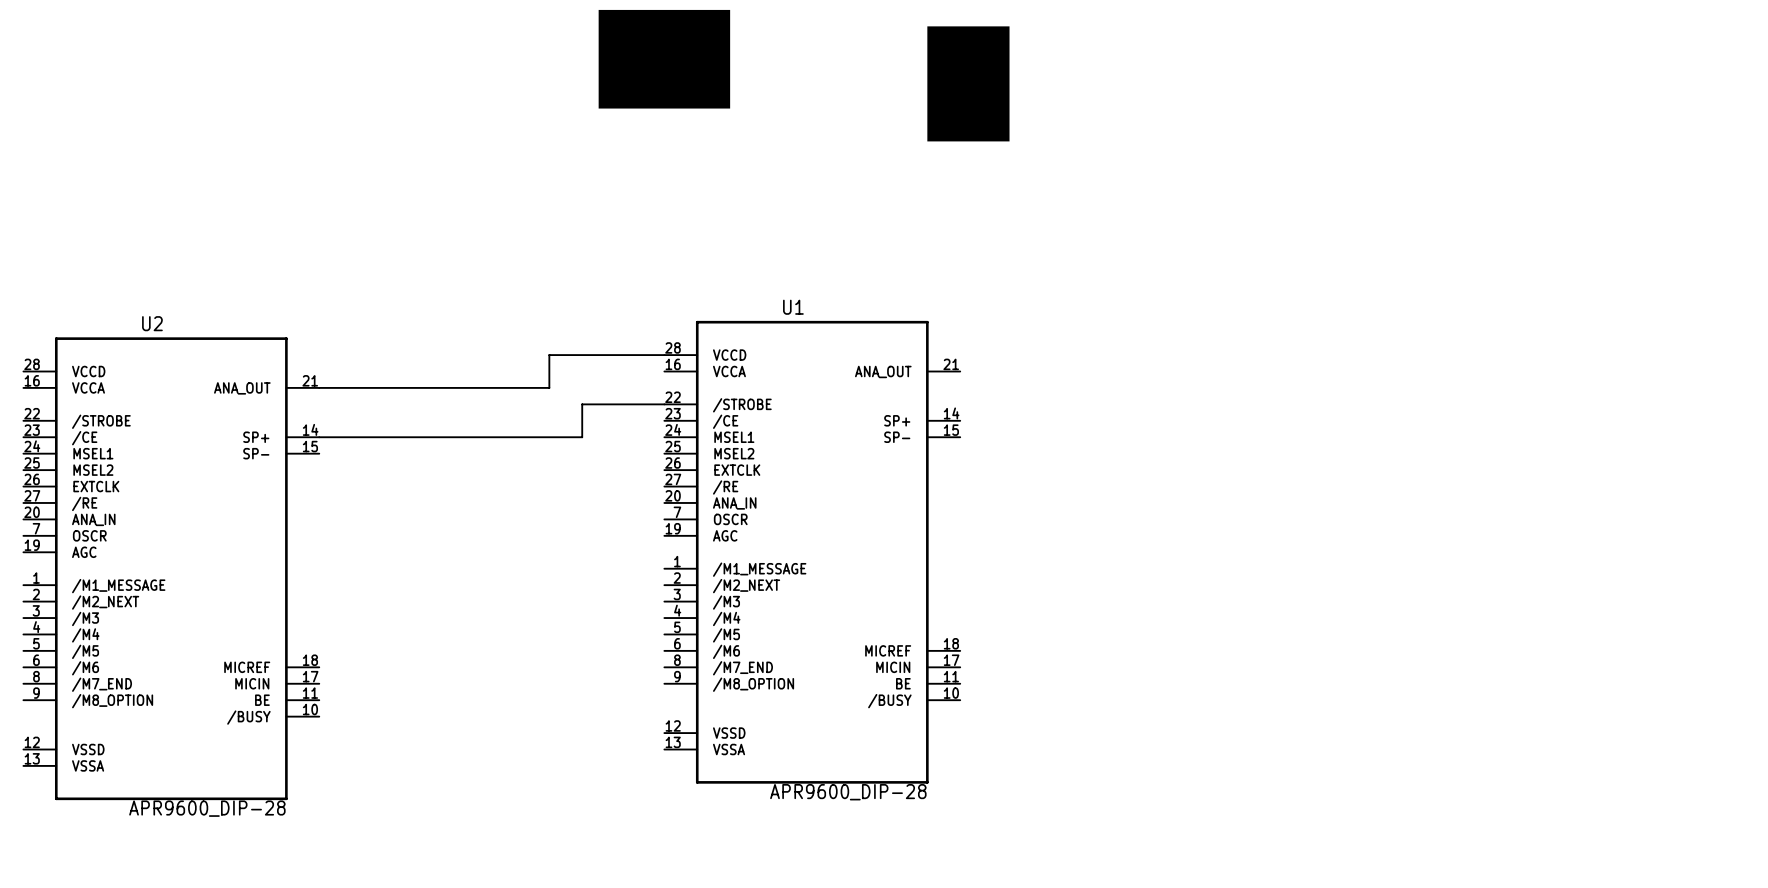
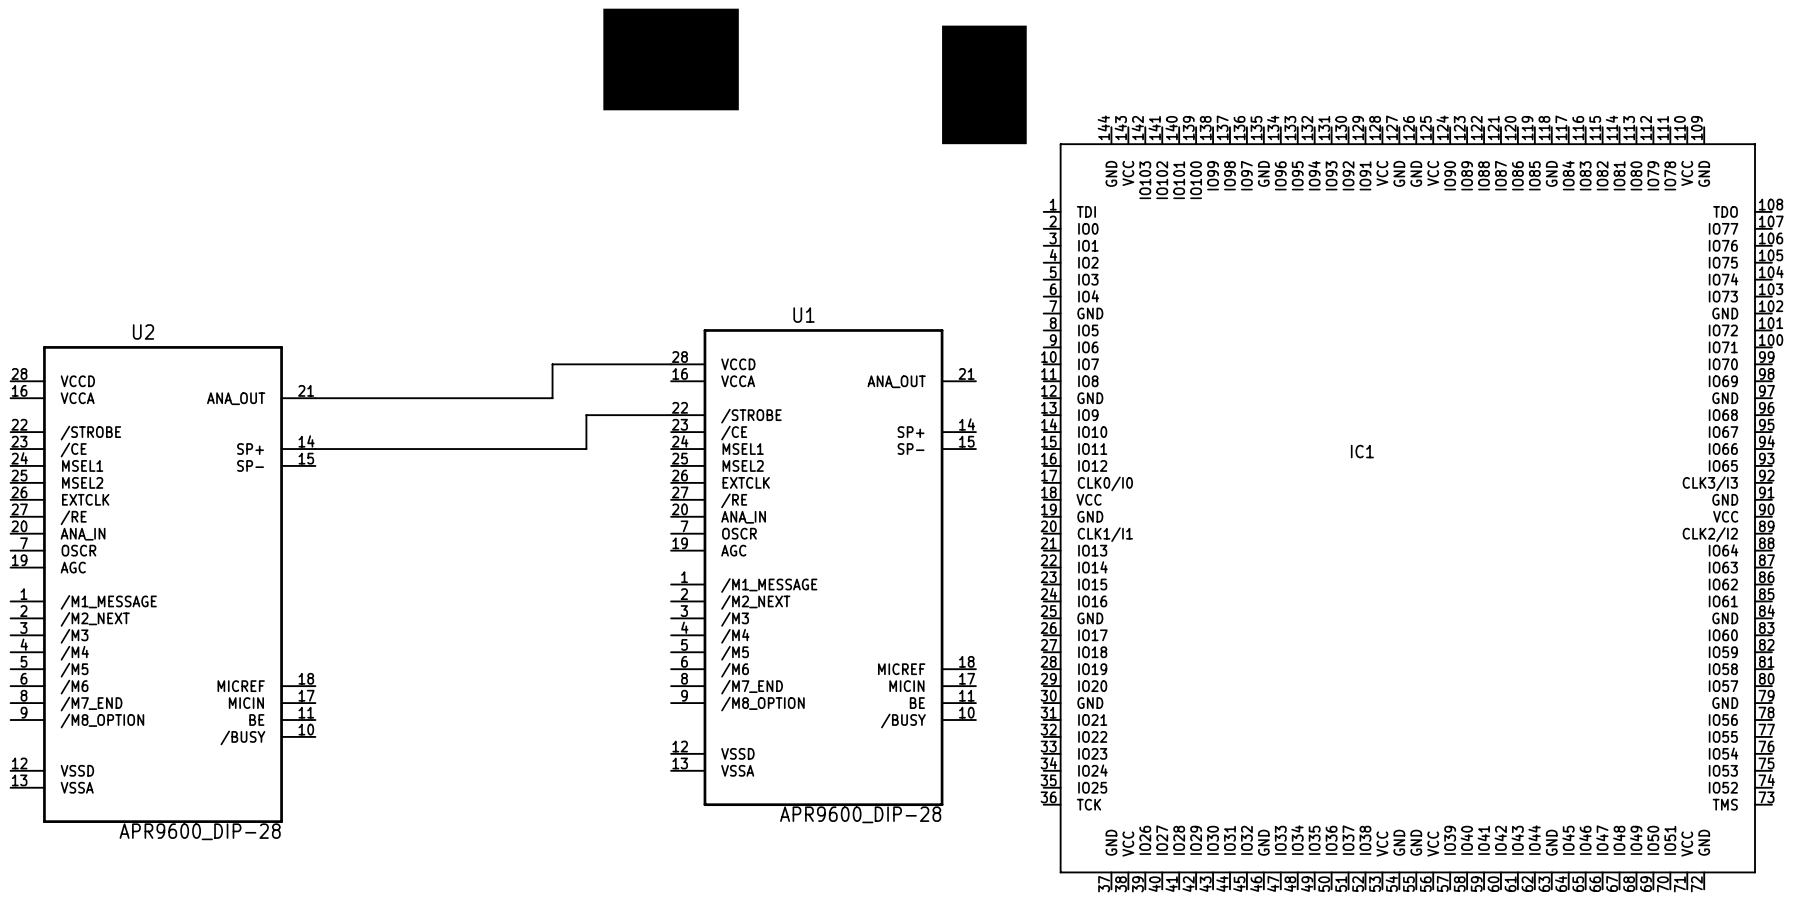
IC1: none -> (1407, 508)

